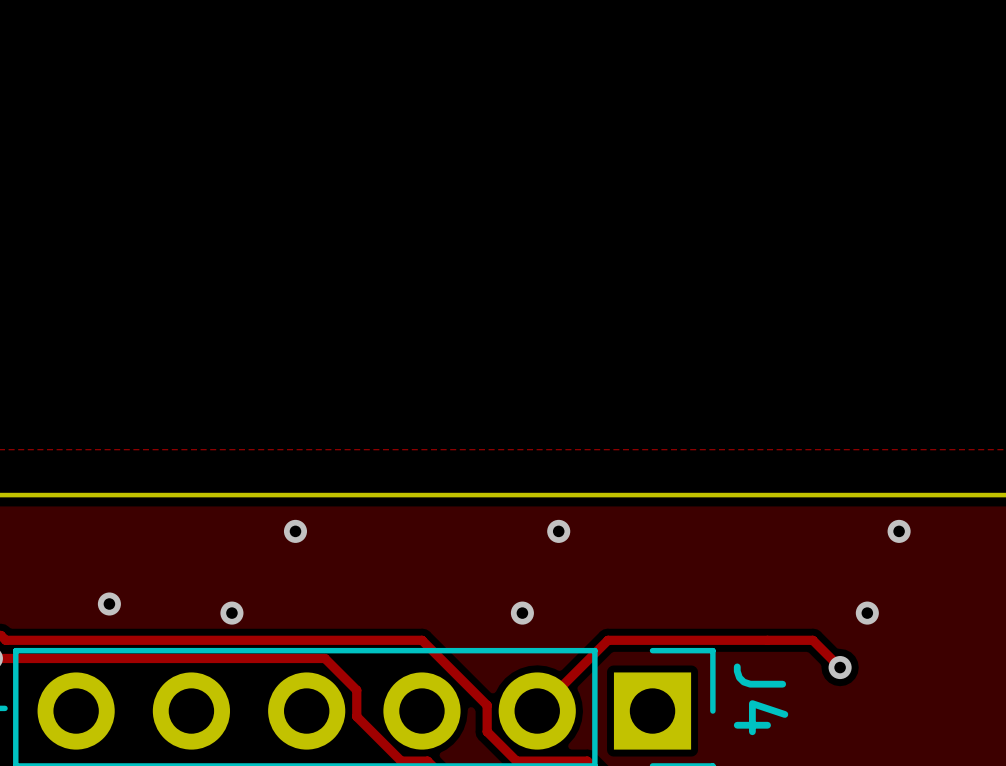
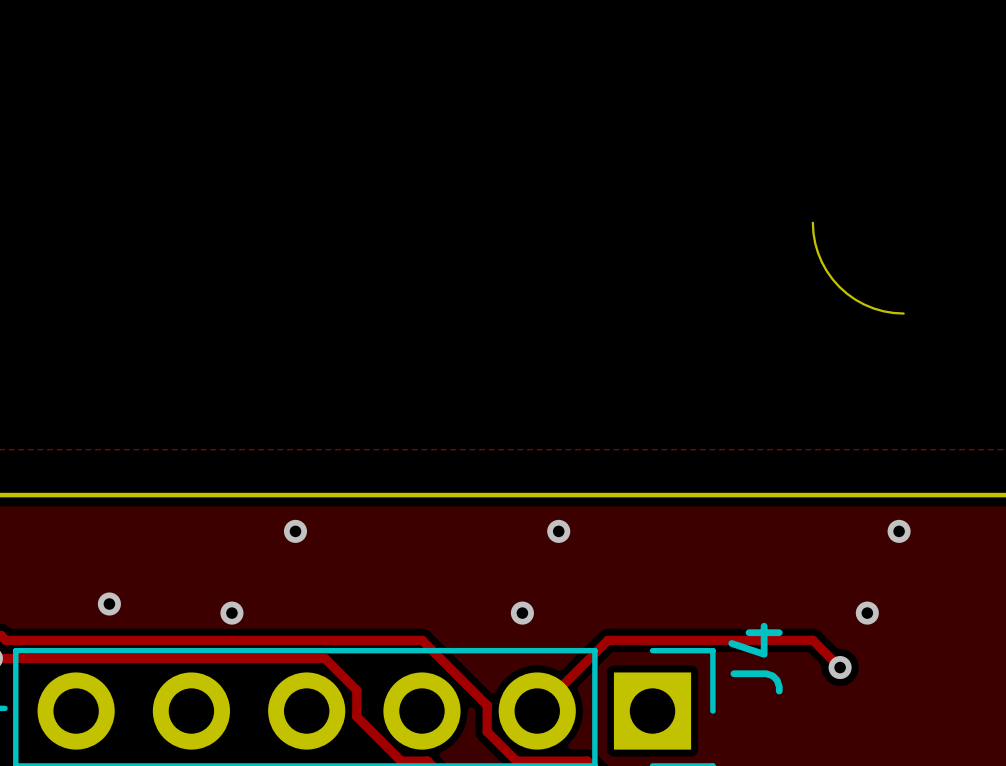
board edge: none -> (812, 222) (817, 252) (826, 271) (839, 286) (864, 304) (883, 311) (903, 313)
J4 name rotation: 0° (761, 699) -> 180° (755, 658)

